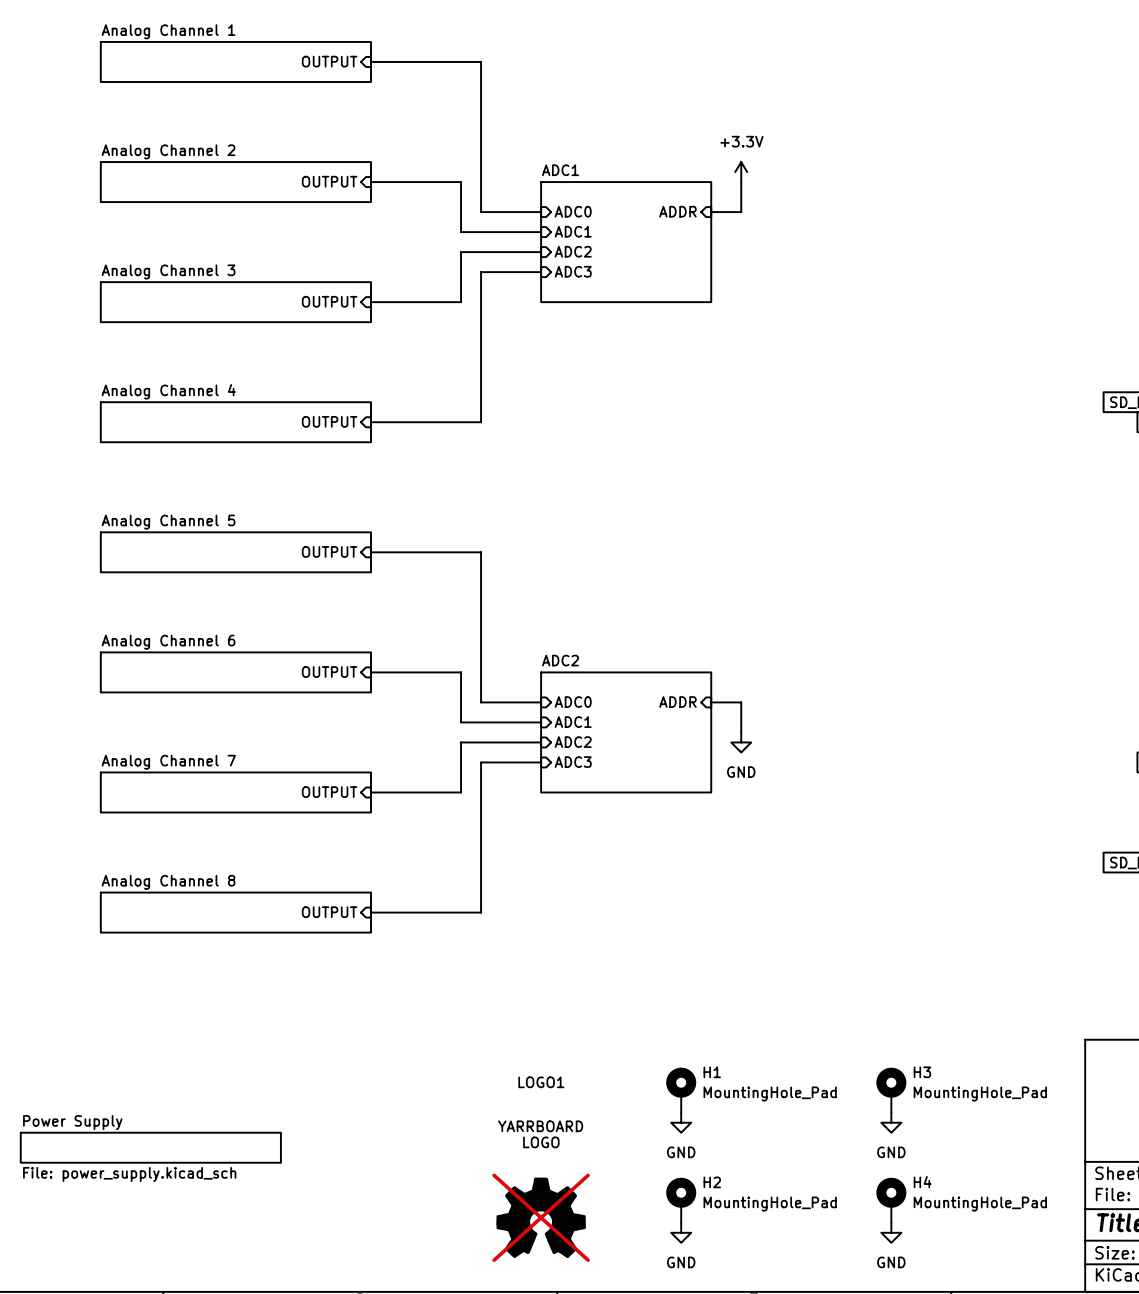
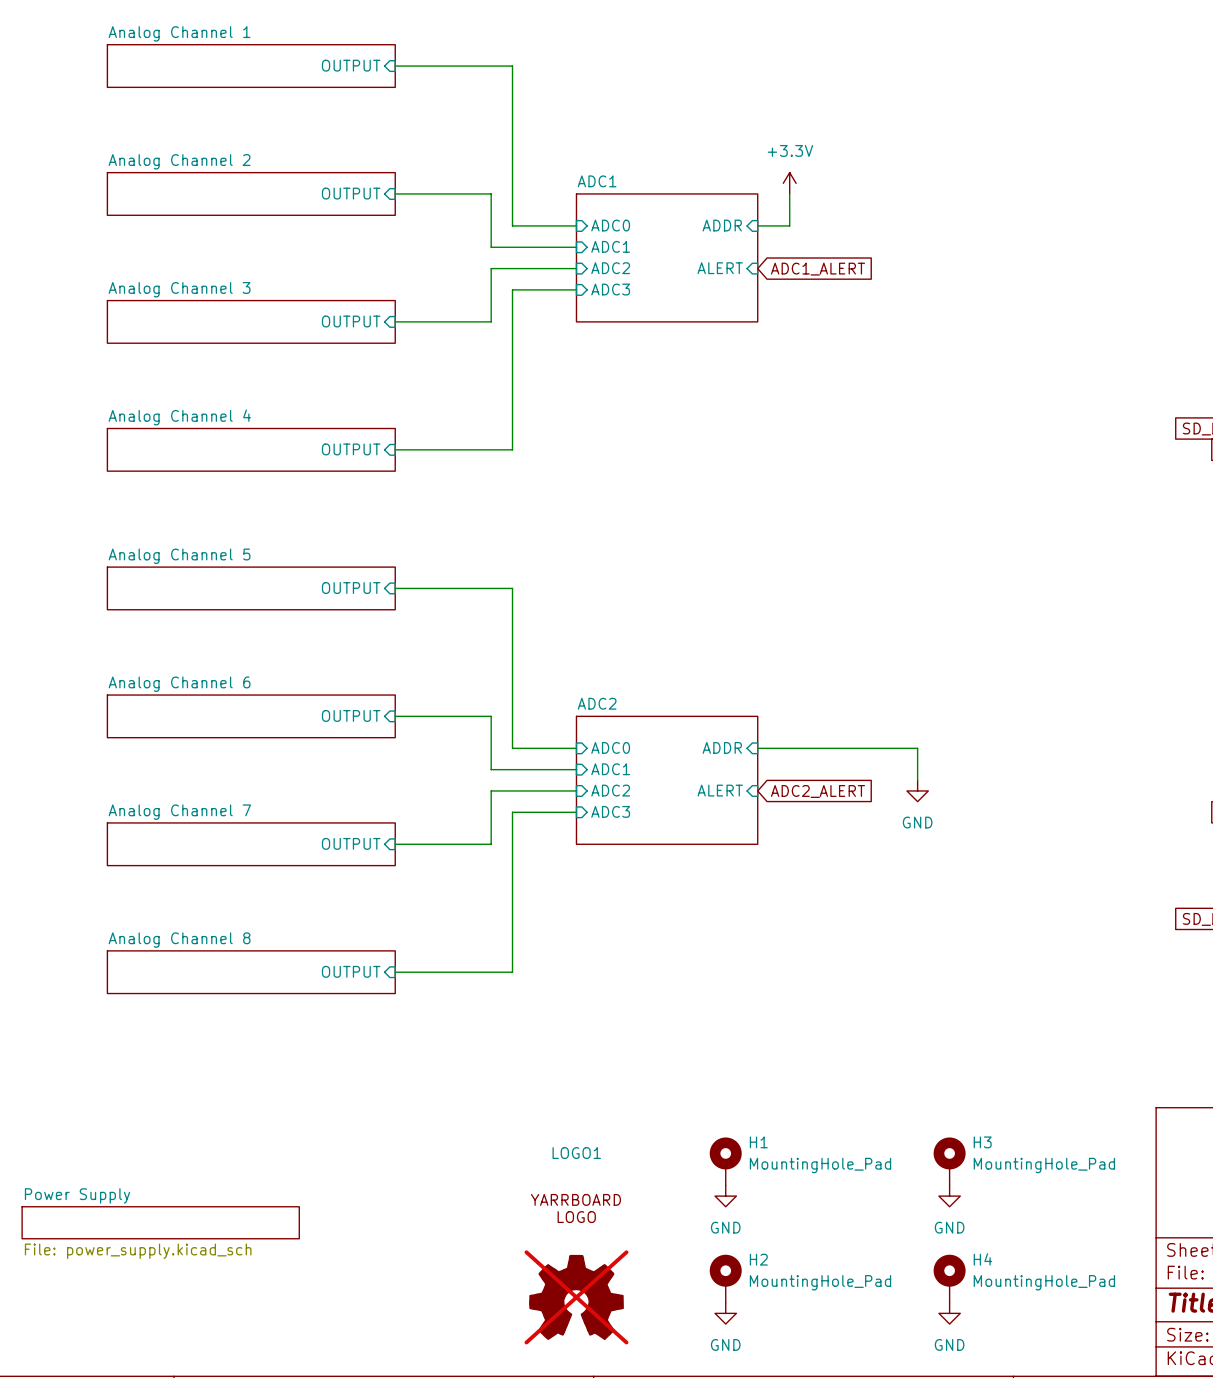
sheet pin: none -> ALERT (720, 268)
global label: none -> ADC1_ALERT (818, 269)
wire: (741, 702) (741, 732) -> (789, 748) (917, 748) (917, 780)
sheet pin: none -> ALERT (720, 790)
power symbol position: GND (741, 742) -> GND (917, 790)
global label: none -> ADC2_ALERT (818, 791)

